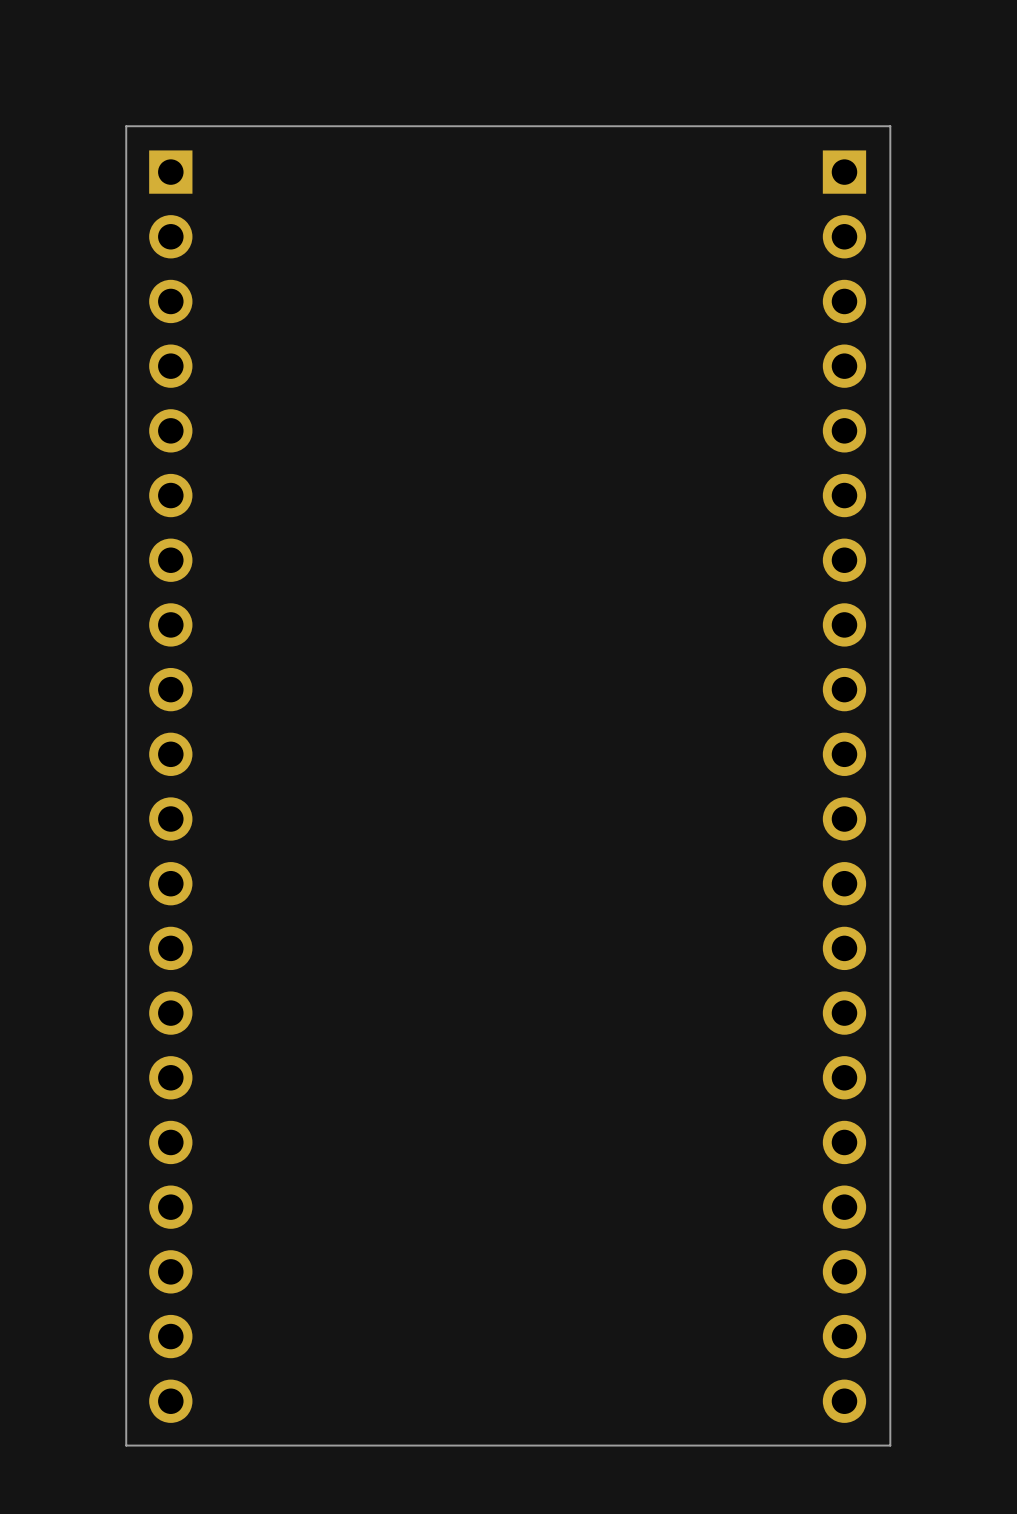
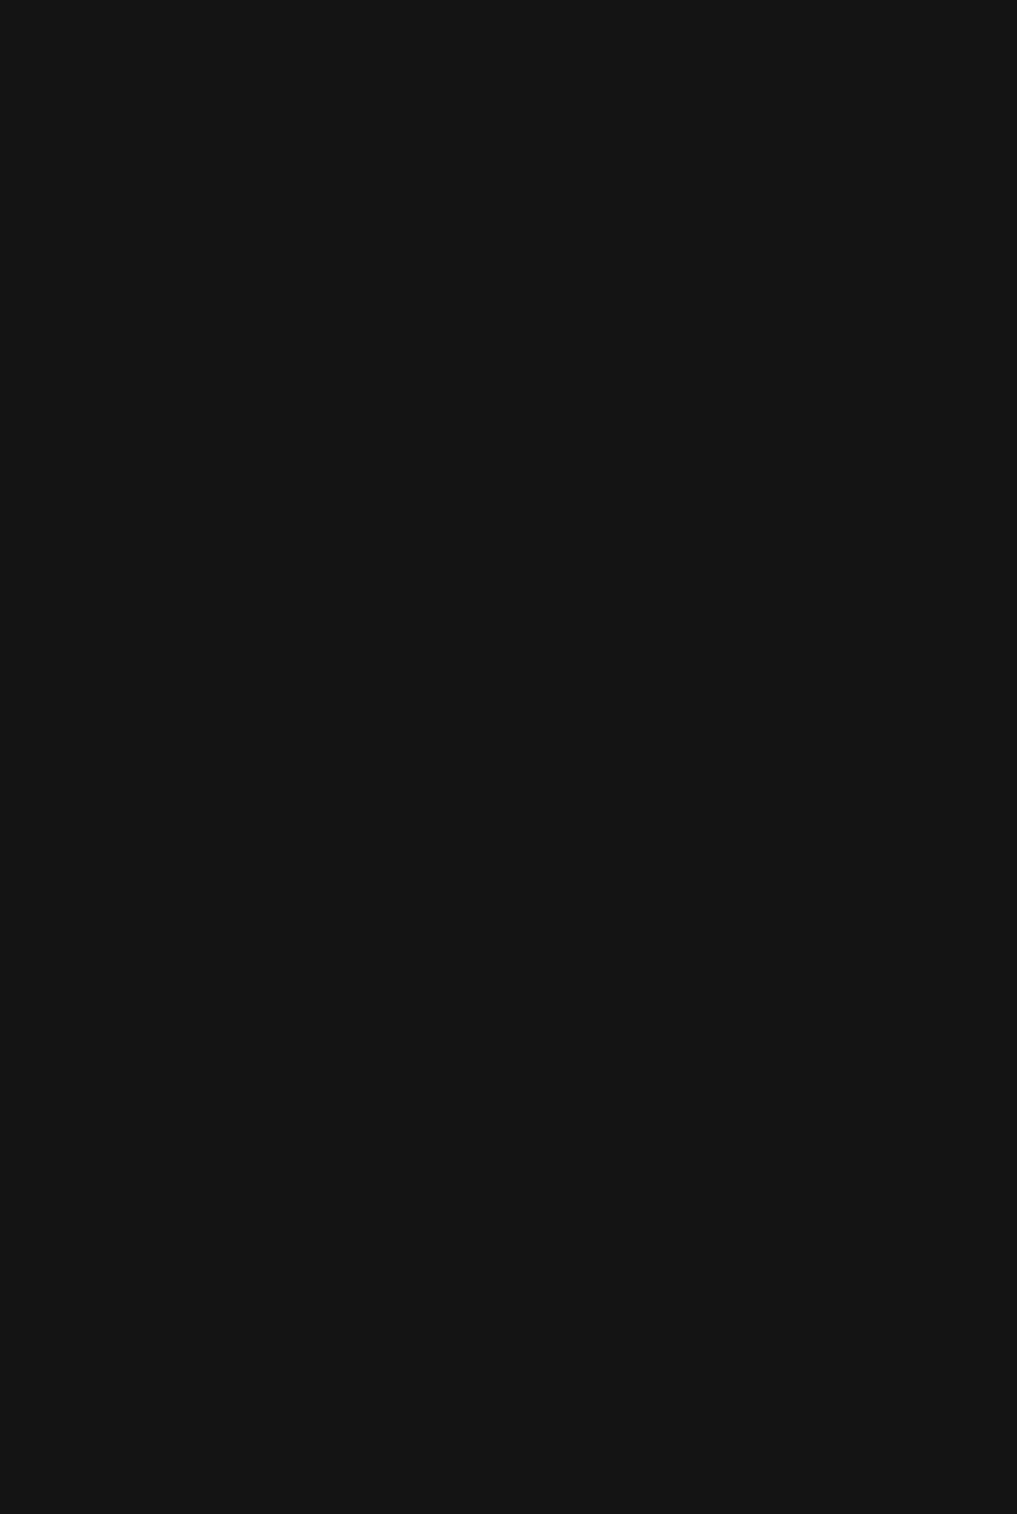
board edge: (890, 126) (126, 126) (126, 1445) (890, 1445) (890, 126) -> none
part: (170, 786) -> none
part: (844, 786) -> none

